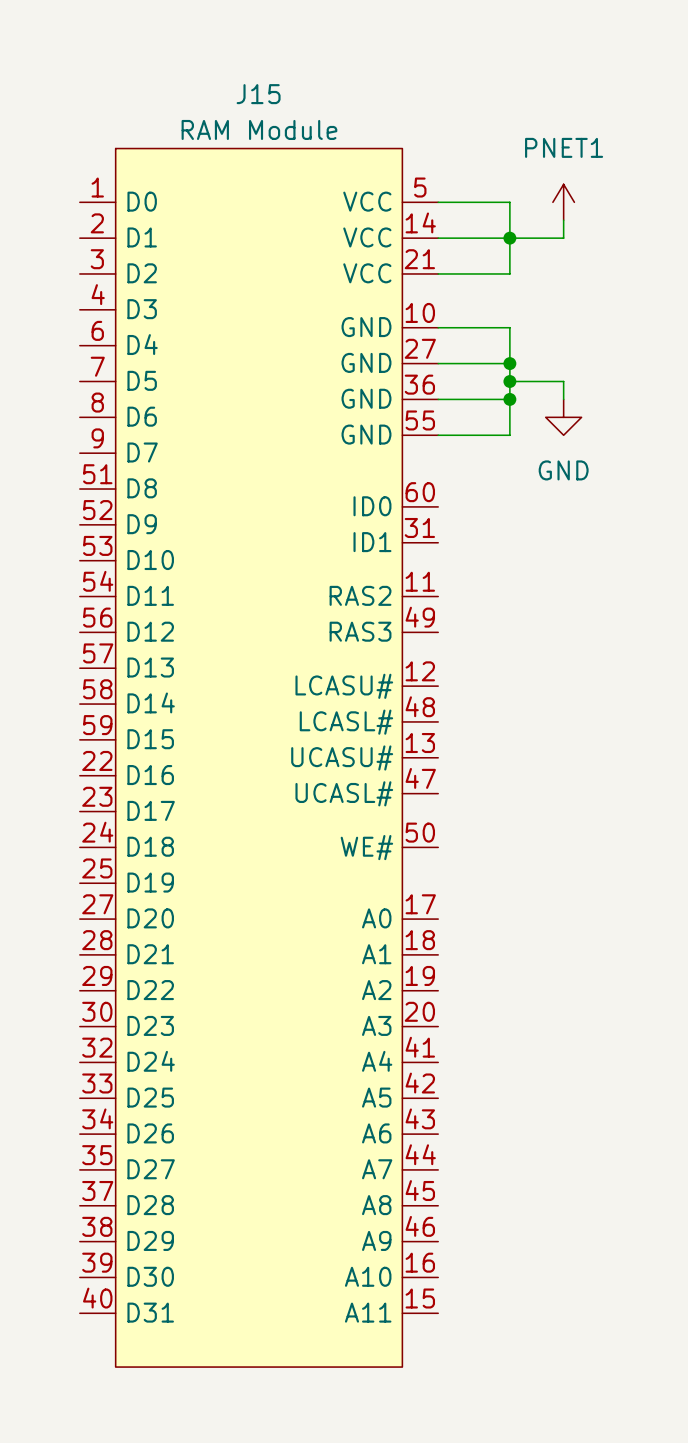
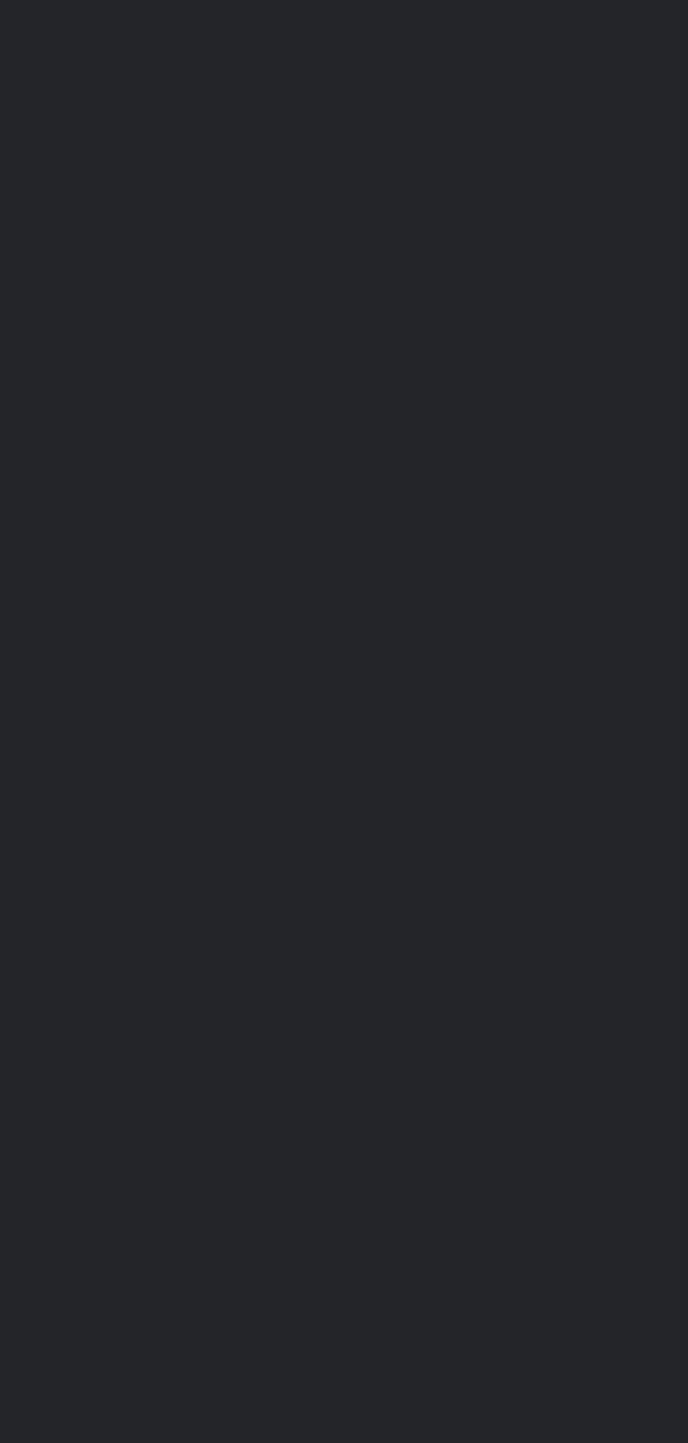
wire: (438, 202) (509, 202) (509, 273) (438, 273) -> none
power symbol: PNET1 (563, 202) -> none
wire: (563, 220) (563, 238) (438, 238) -> none
junction: (509, 238) -> none
wire: (438, 327) (509, 327) (509, 435) (438, 435) -> none
wire: (438, 363) (509, 363) -> none
junction: (509, 363) -> none
wire: (509, 381) (563, 381) (563, 399) -> none
junction: (509, 381) -> none
wire: (438, 399) (509, 399) -> none
junction: (509, 399) -> none
power symbol: GND (563, 417) -> none
J15: RAM Module (259, 757) -> none

